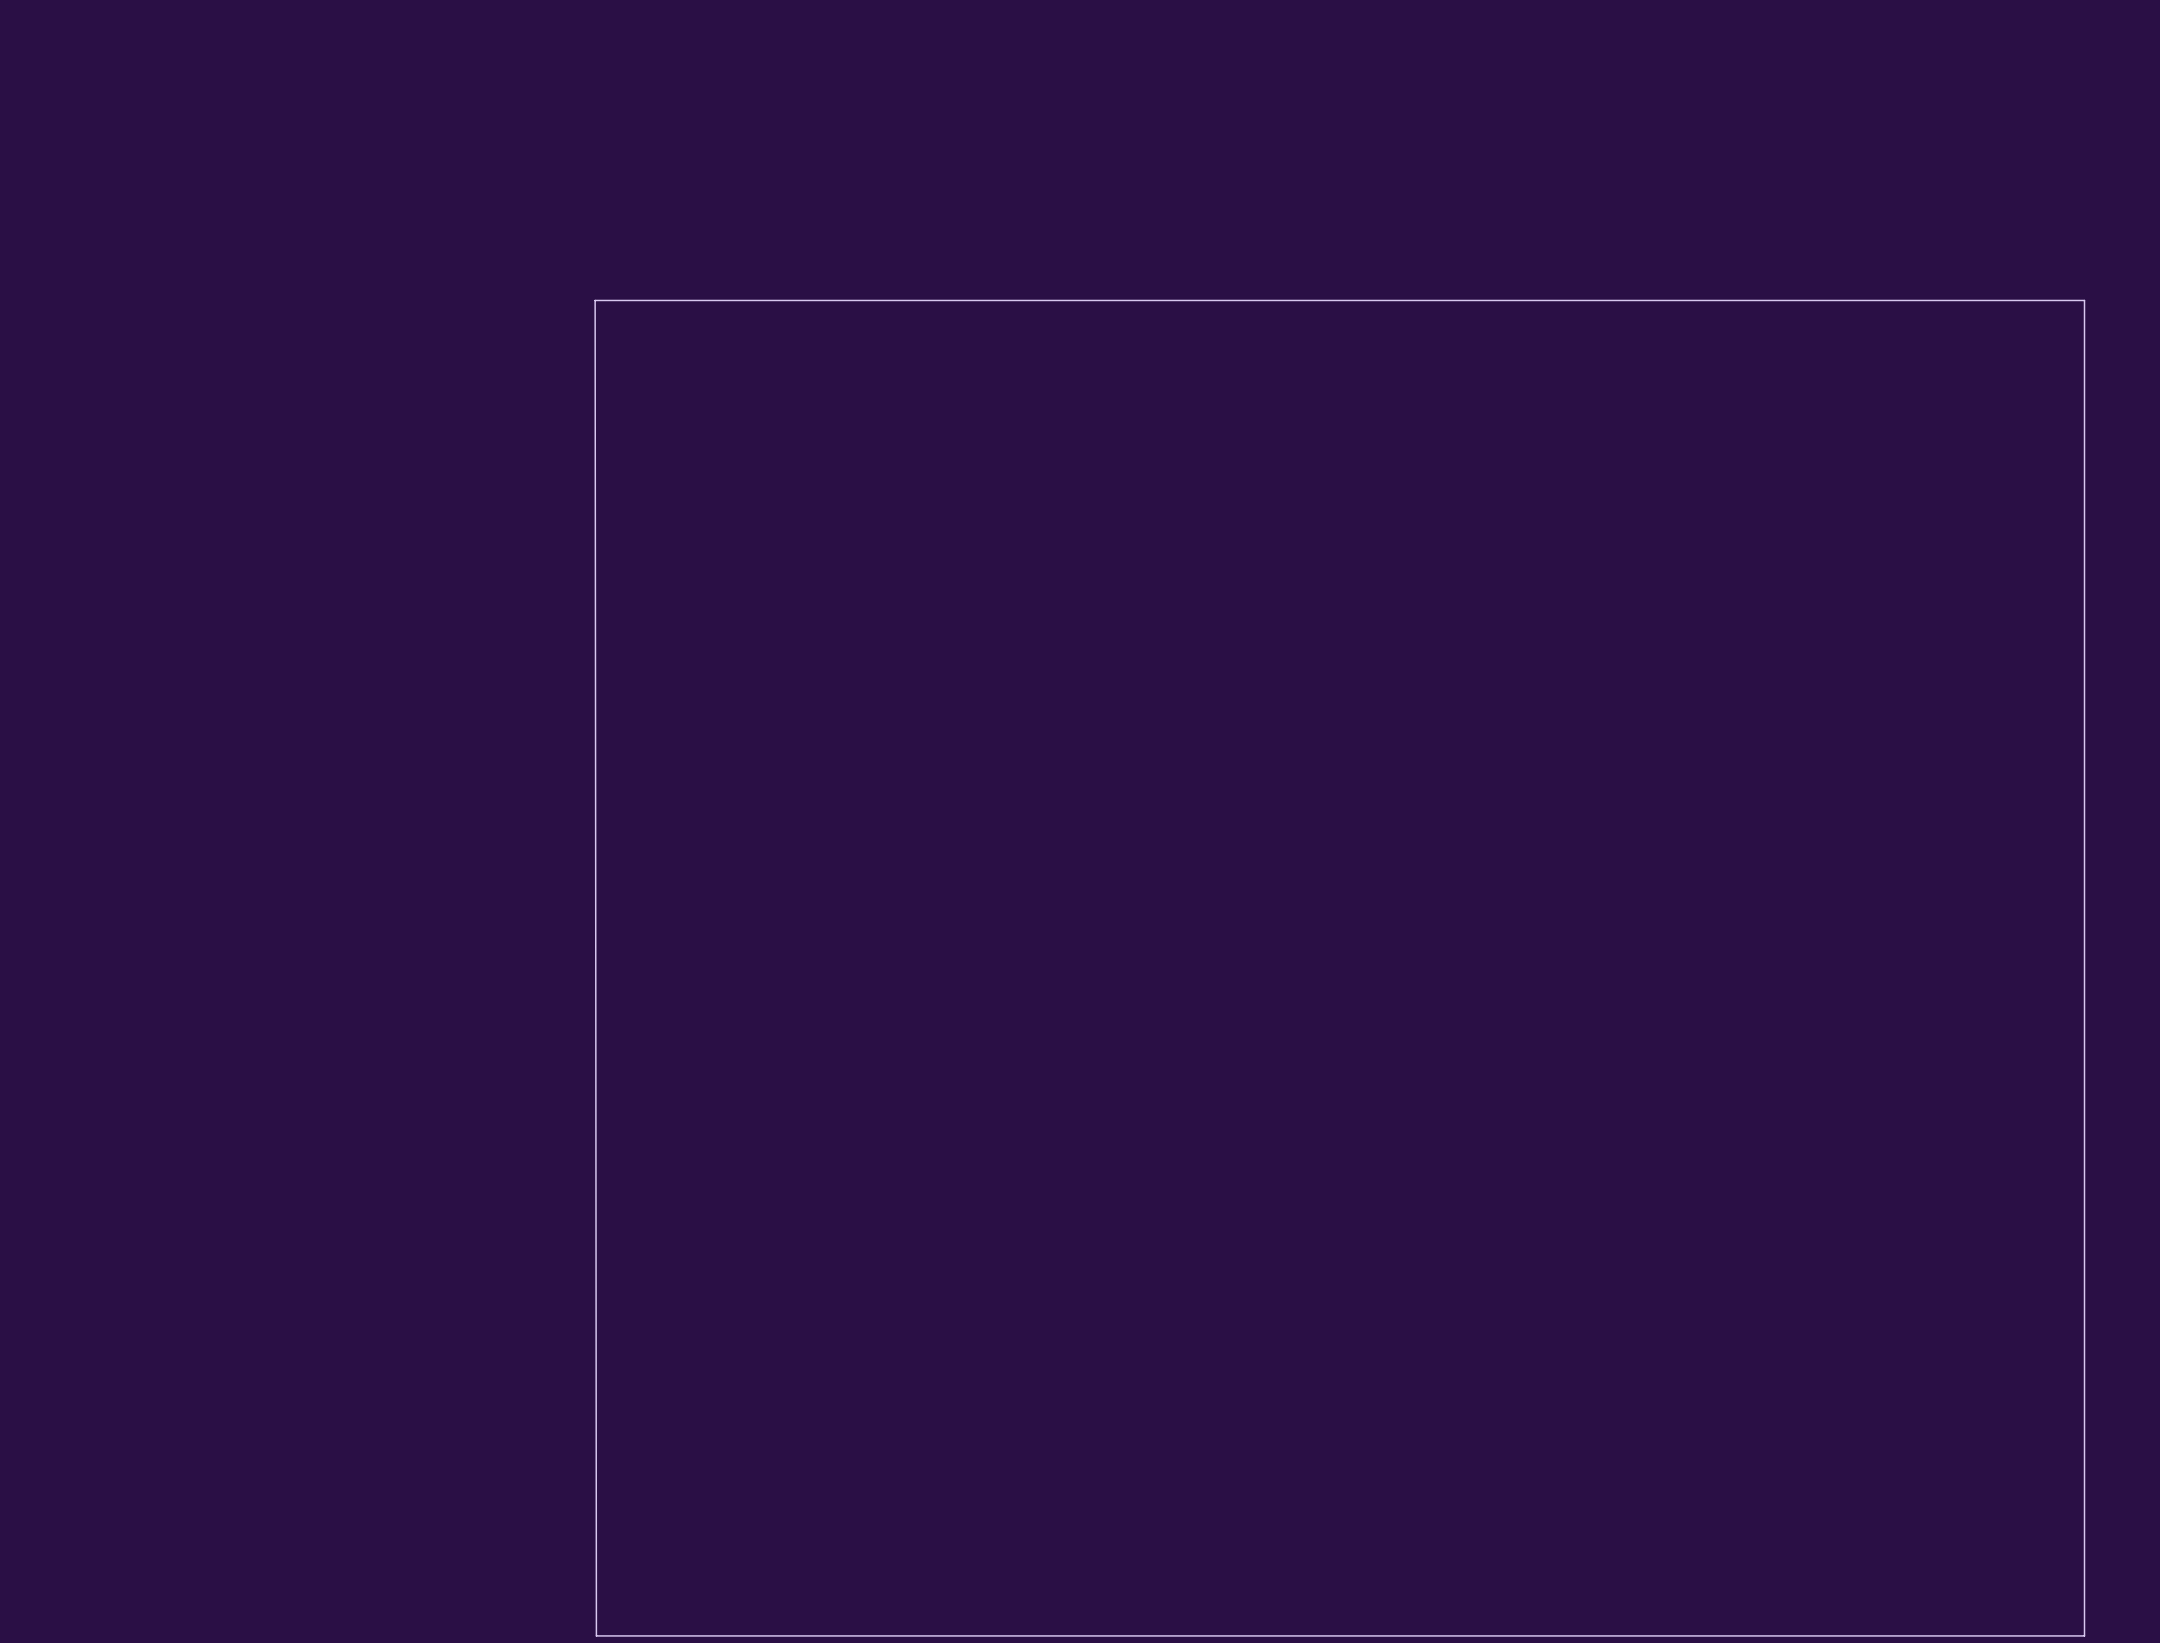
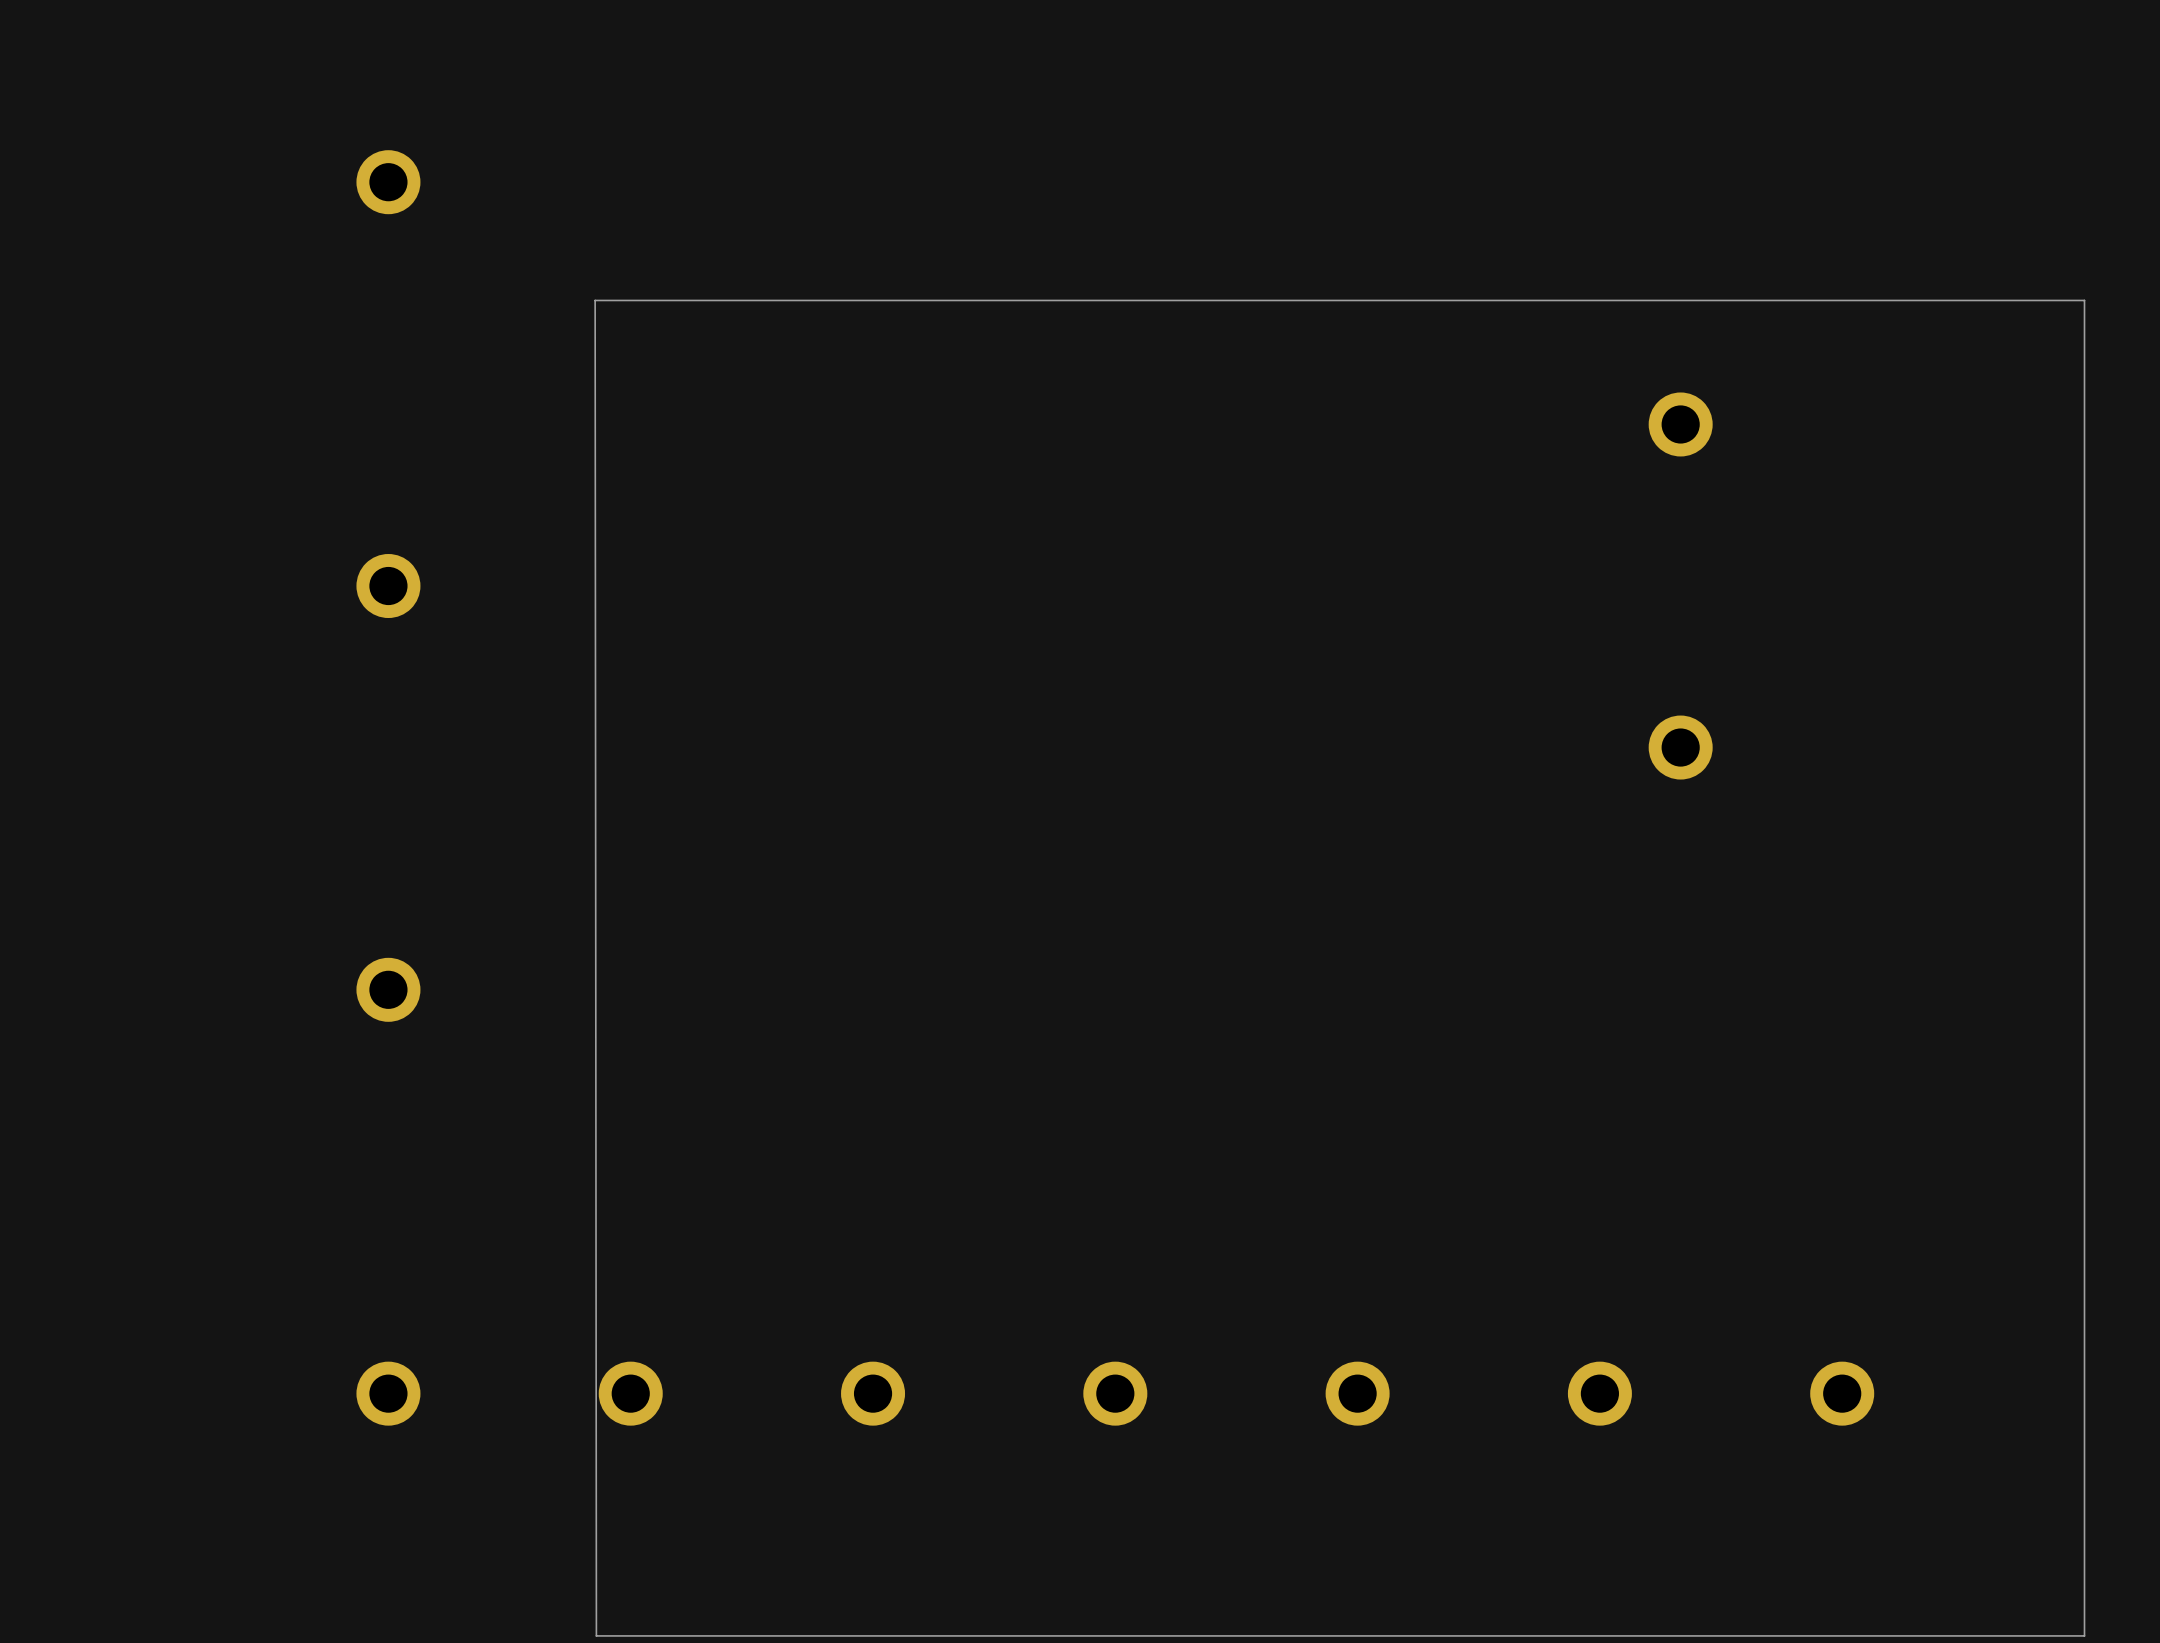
part: none -> (388, 182)
part: none -> (1680, 424)
part: none -> (388, 586)
part: none -> (1680, 747)
part: none -> (388, 989)
part: none -> (388, 1393)
part: none -> (630, 1393)
part: none -> (873, 1393)
part: none -> (1115, 1393)
part: none -> (1357, 1393)
part: none -> (1599, 1393)
part: none -> (1842, 1393)

